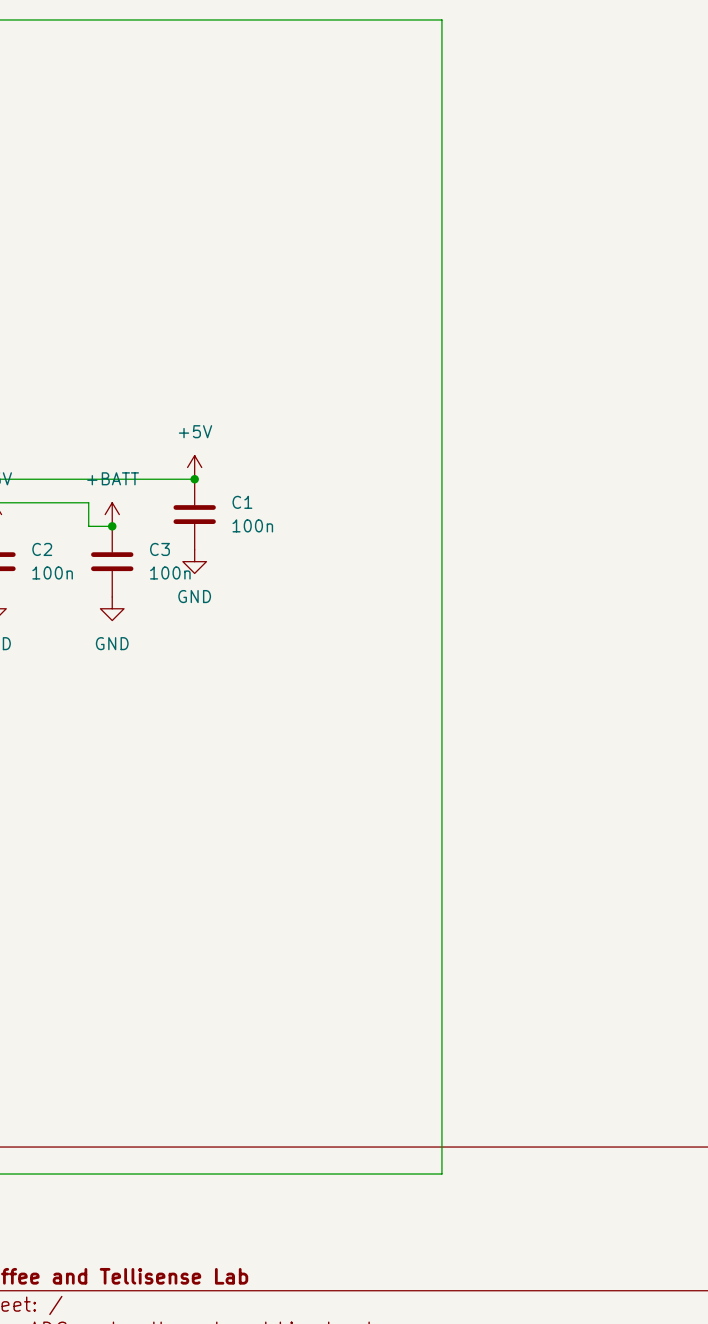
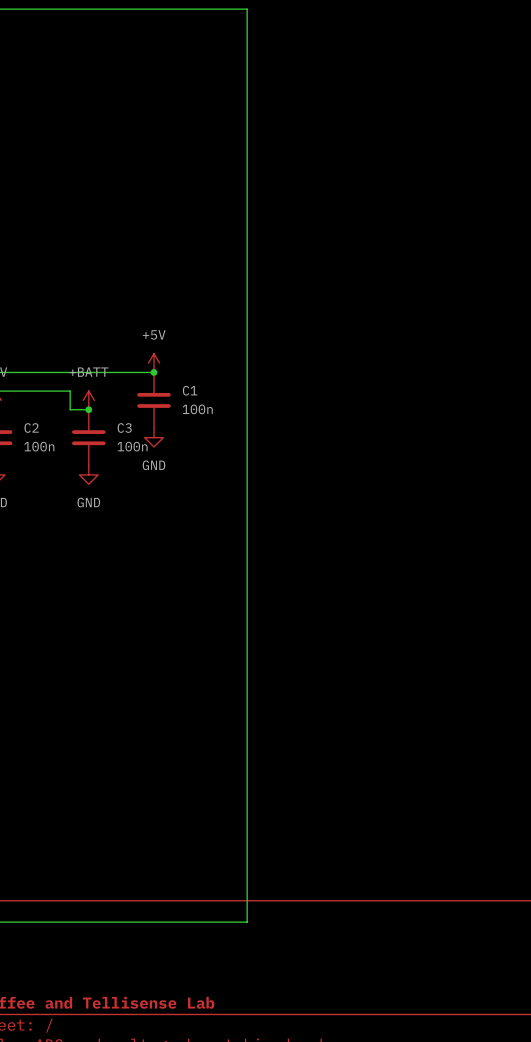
wire: (312, 19) (441, 19) (441, 1174) (312, 1174) -> (247, 9) (247, 922)

